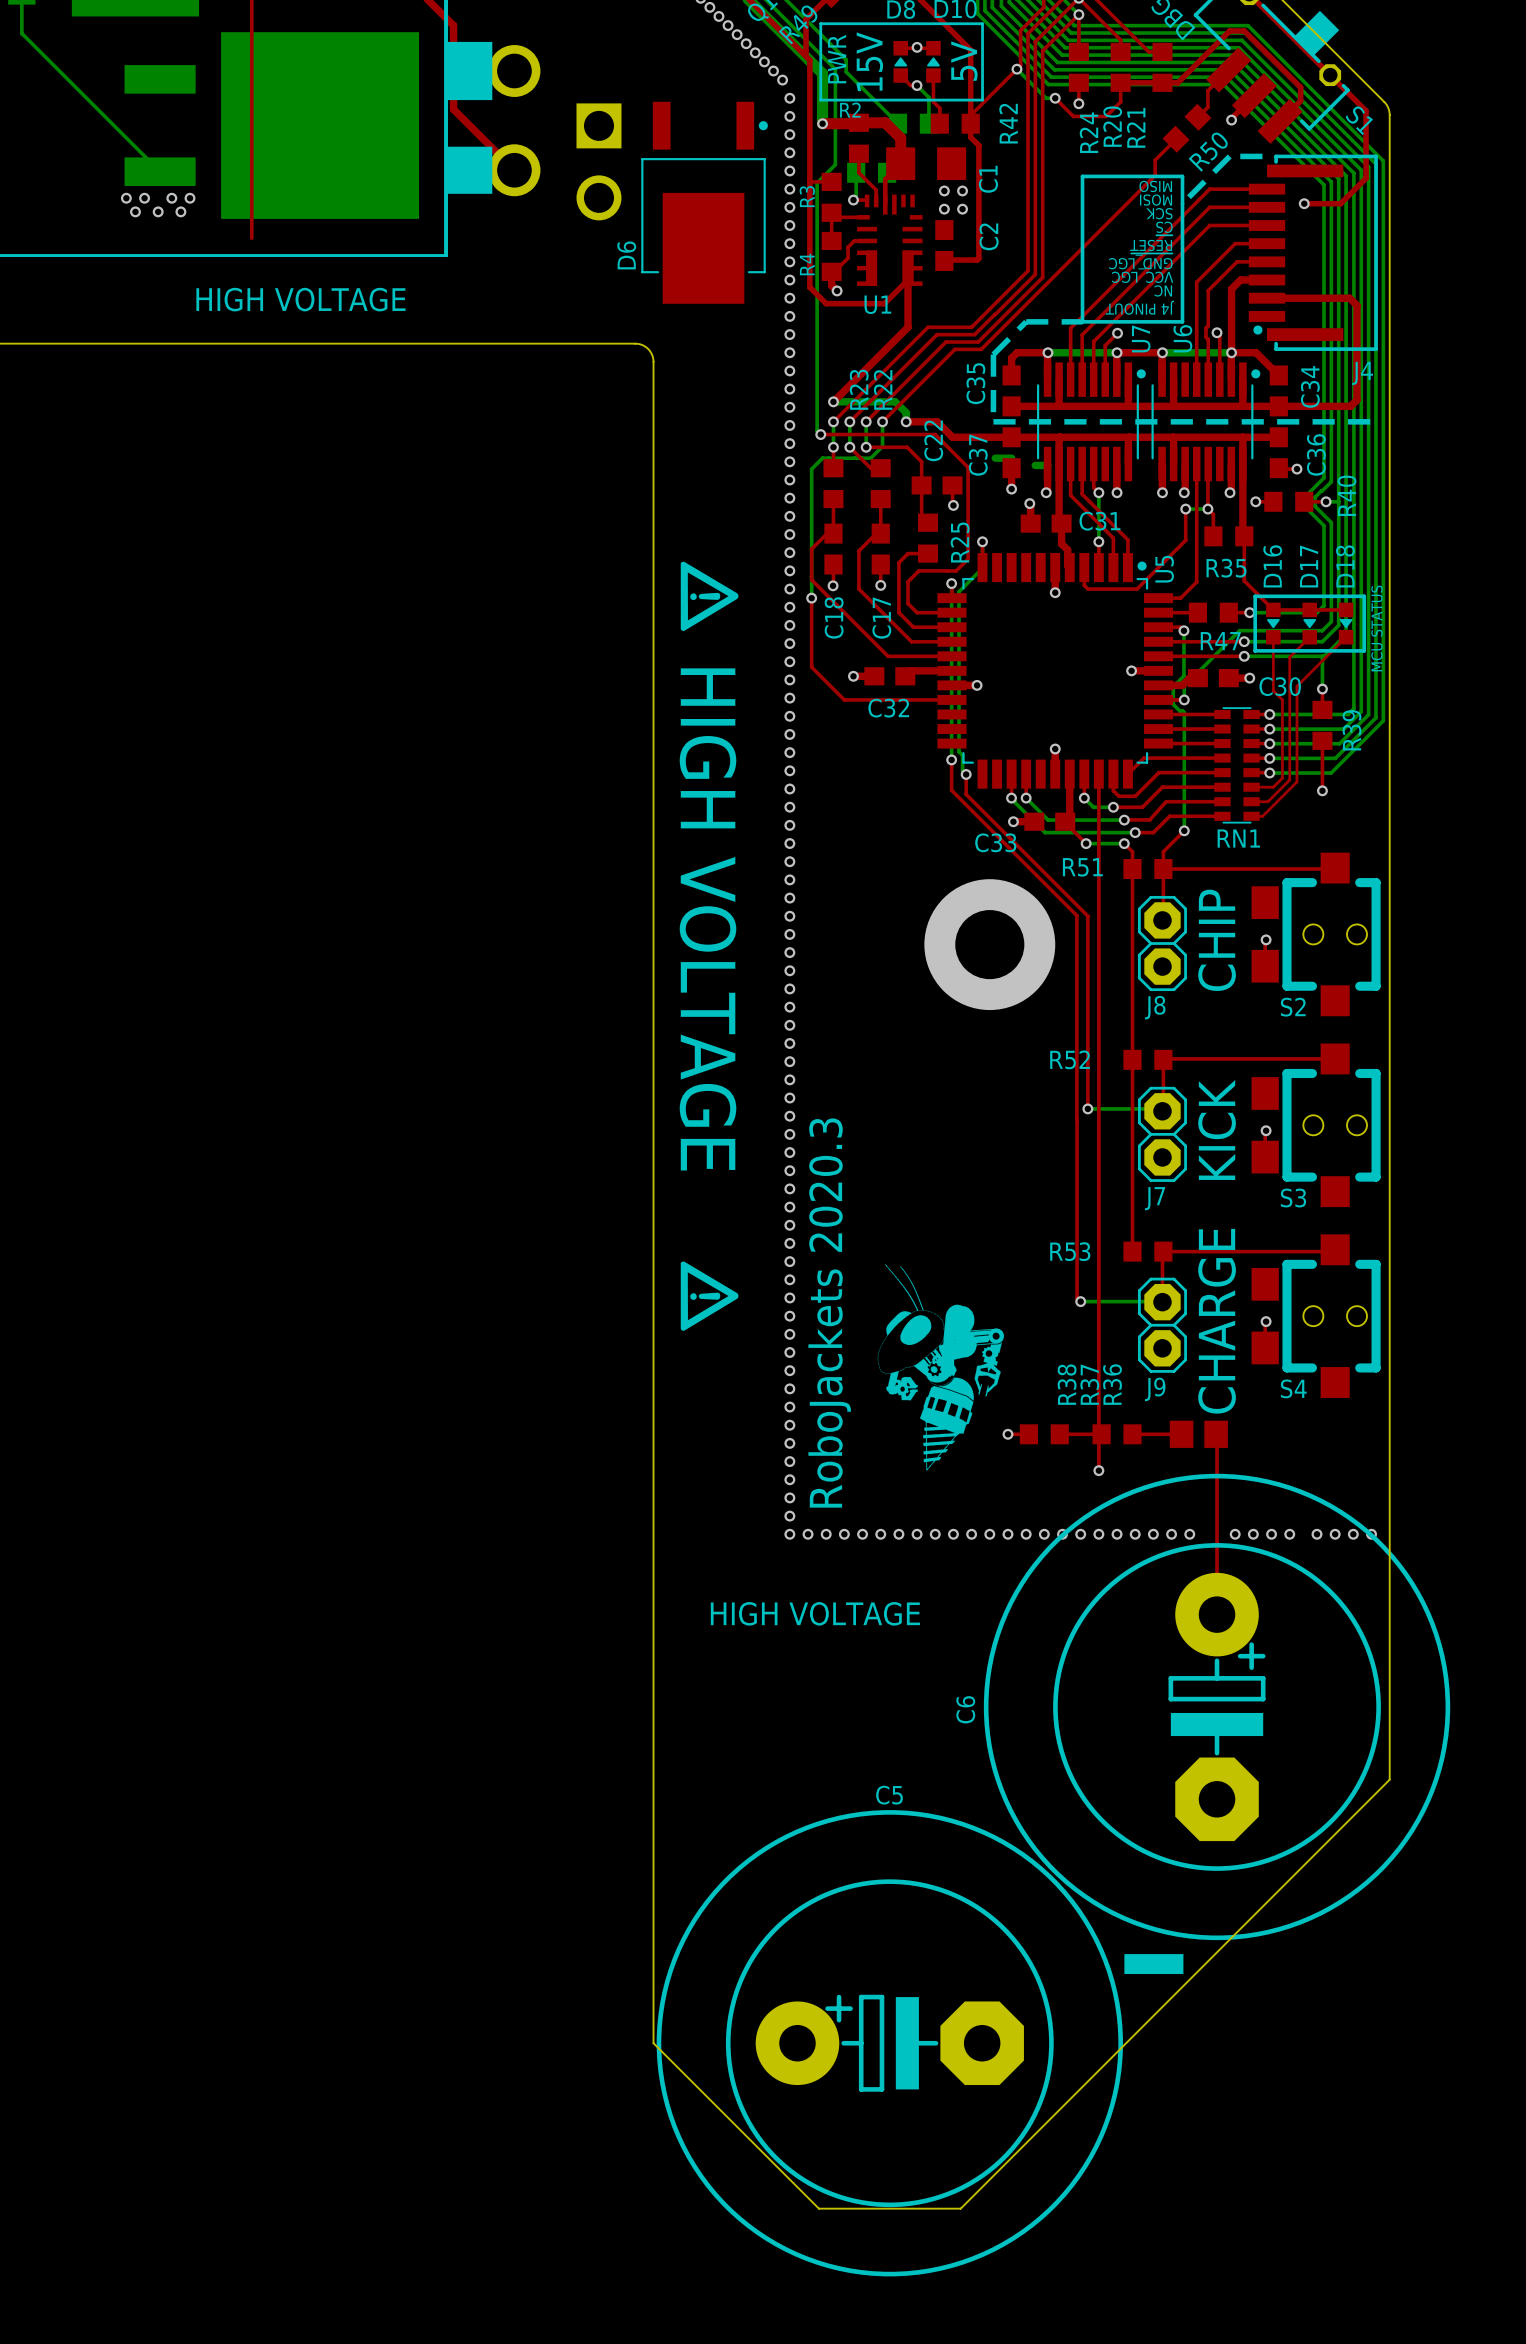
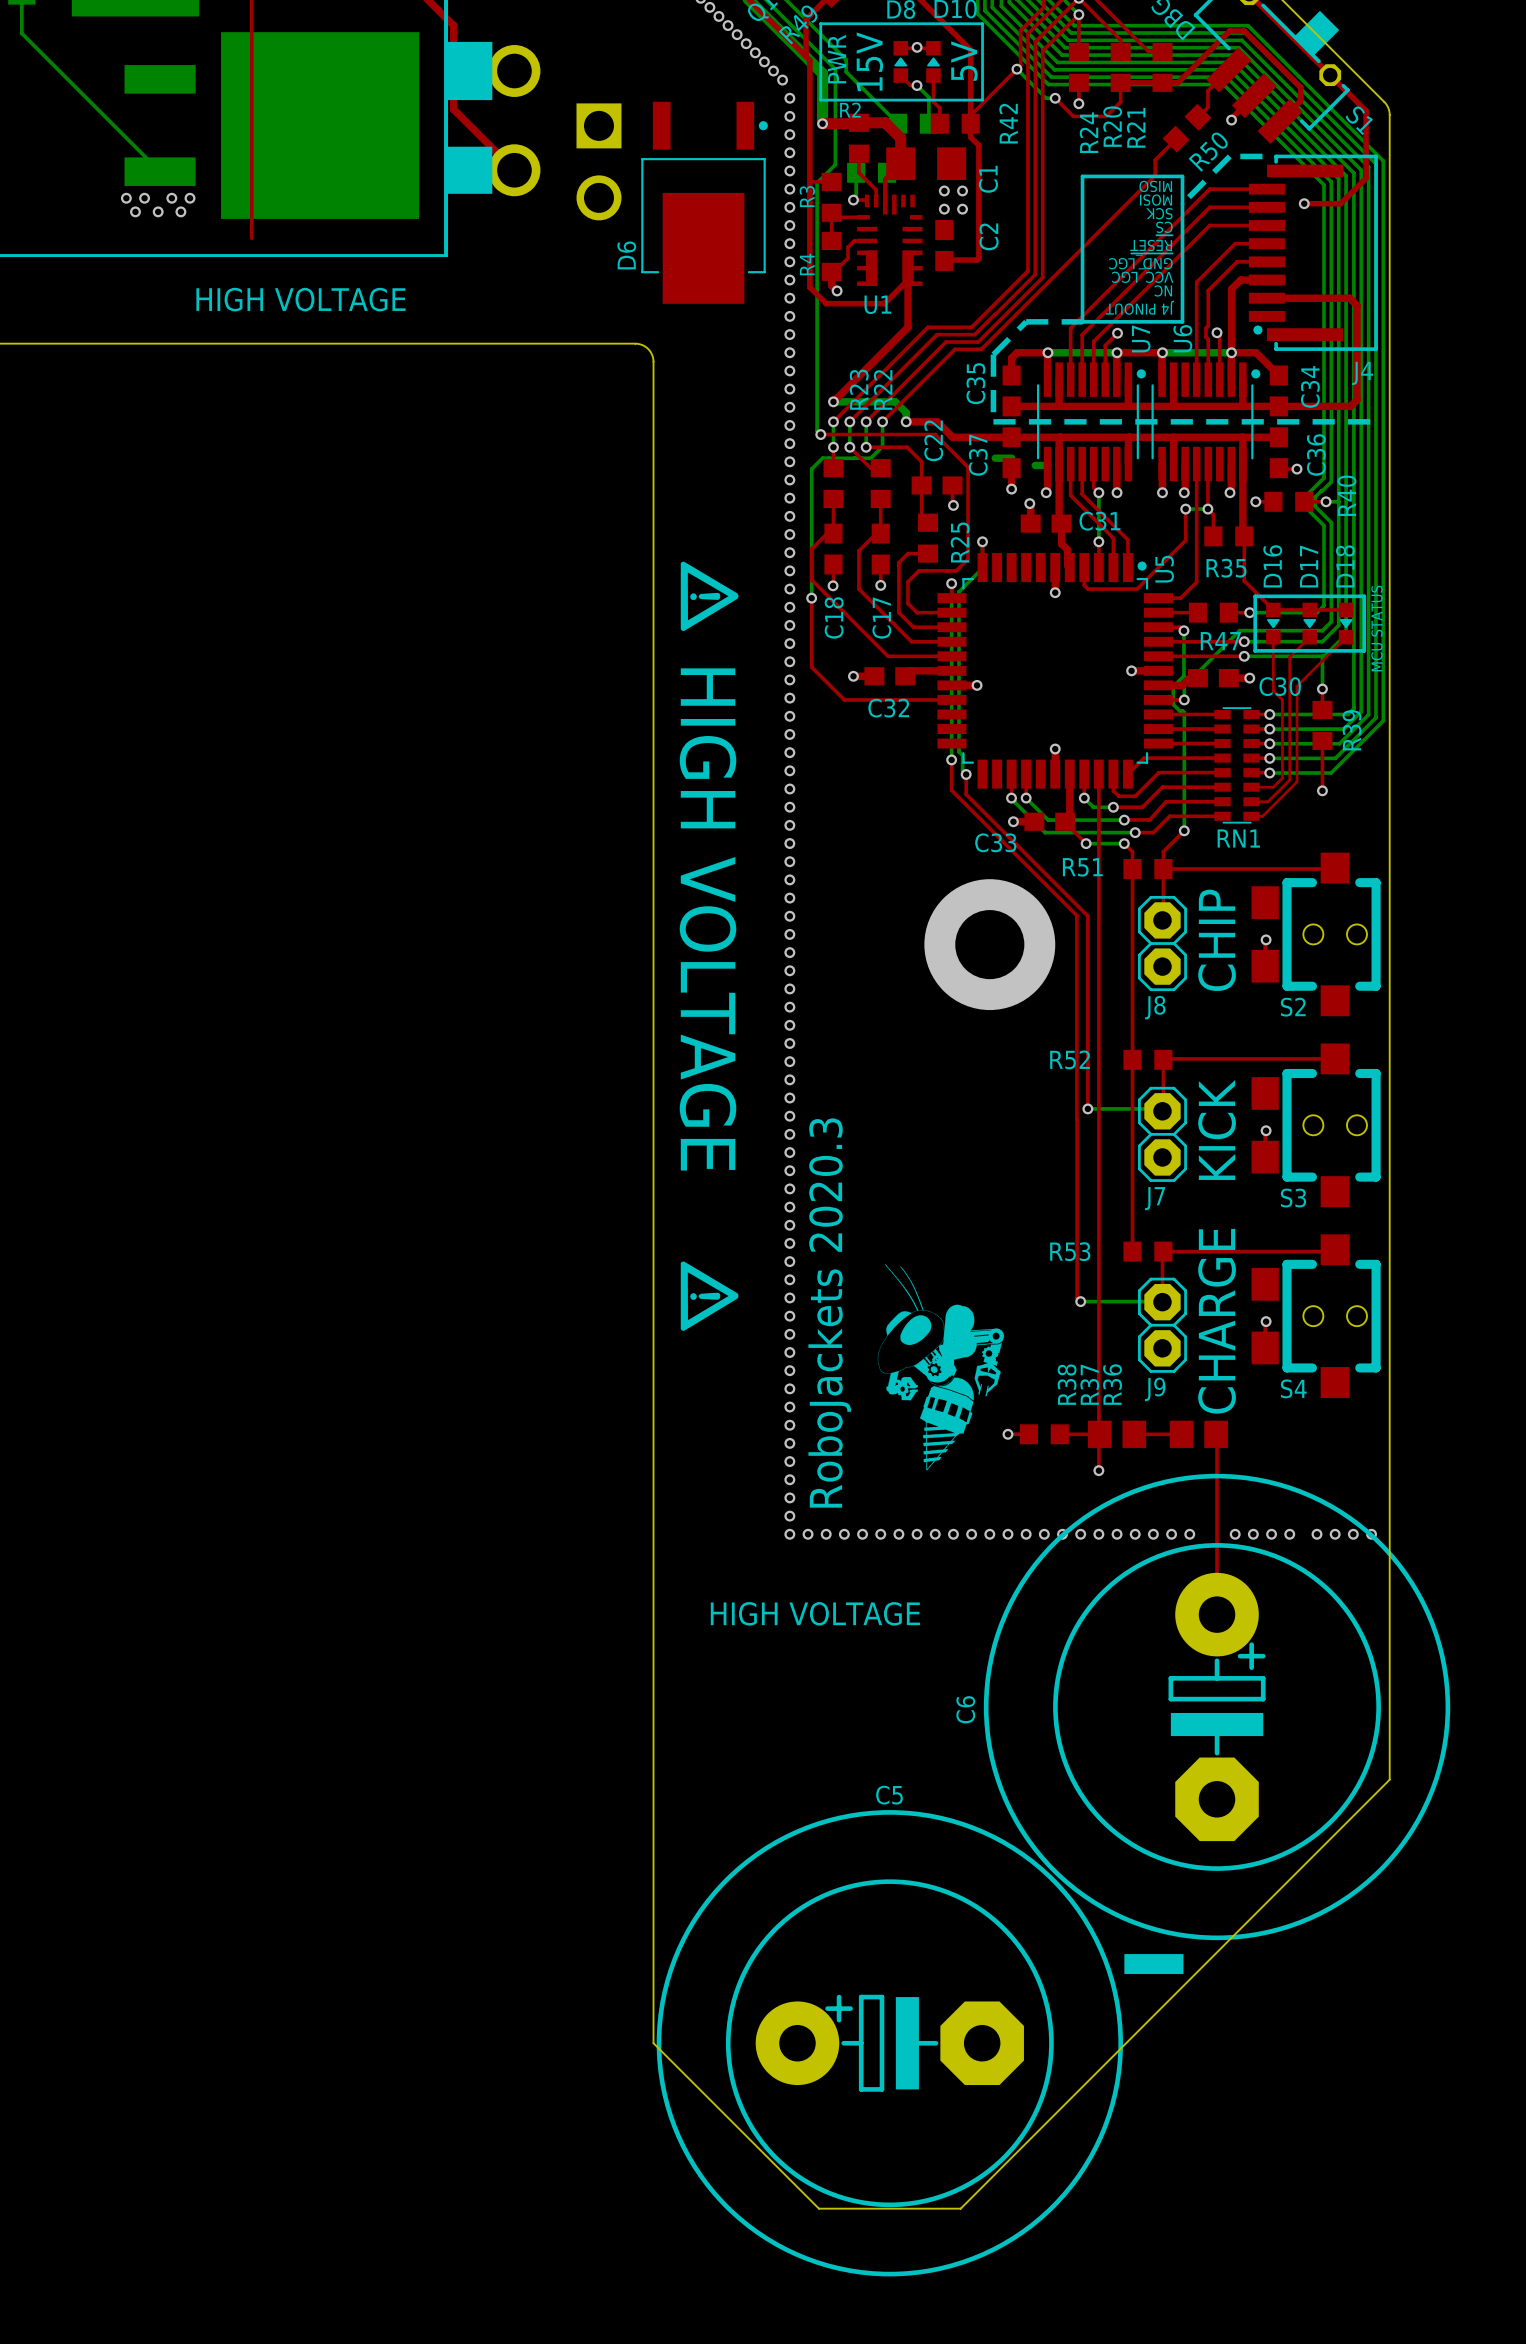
R37 footprint: [1092, 1424, 1142, 1445] -> [1087, 1420, 1147, 1448]

